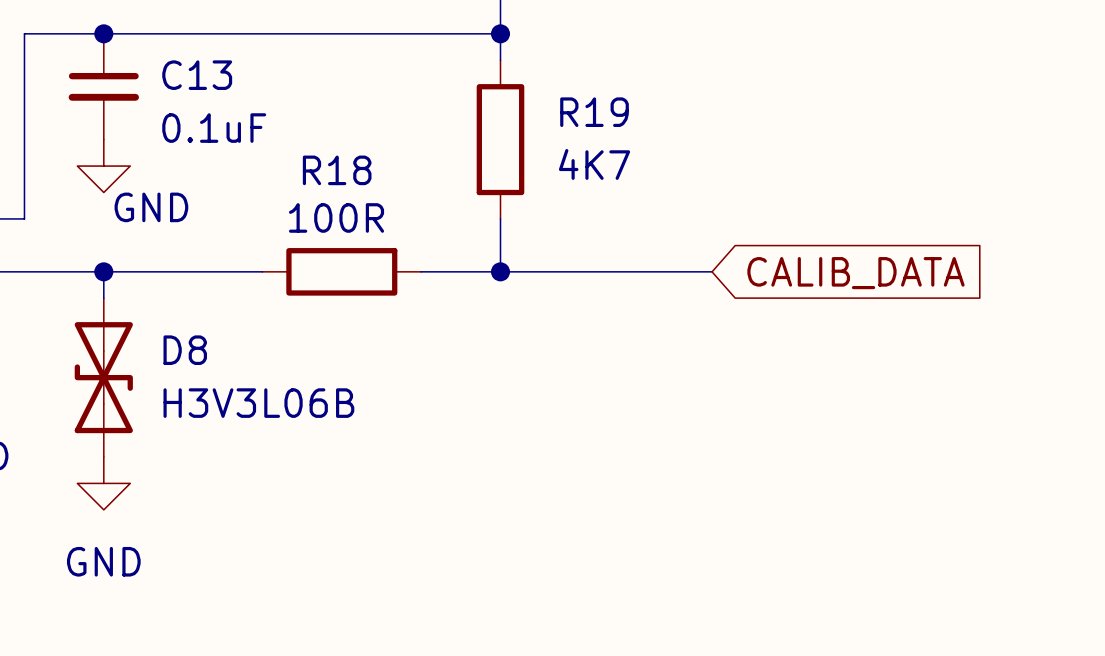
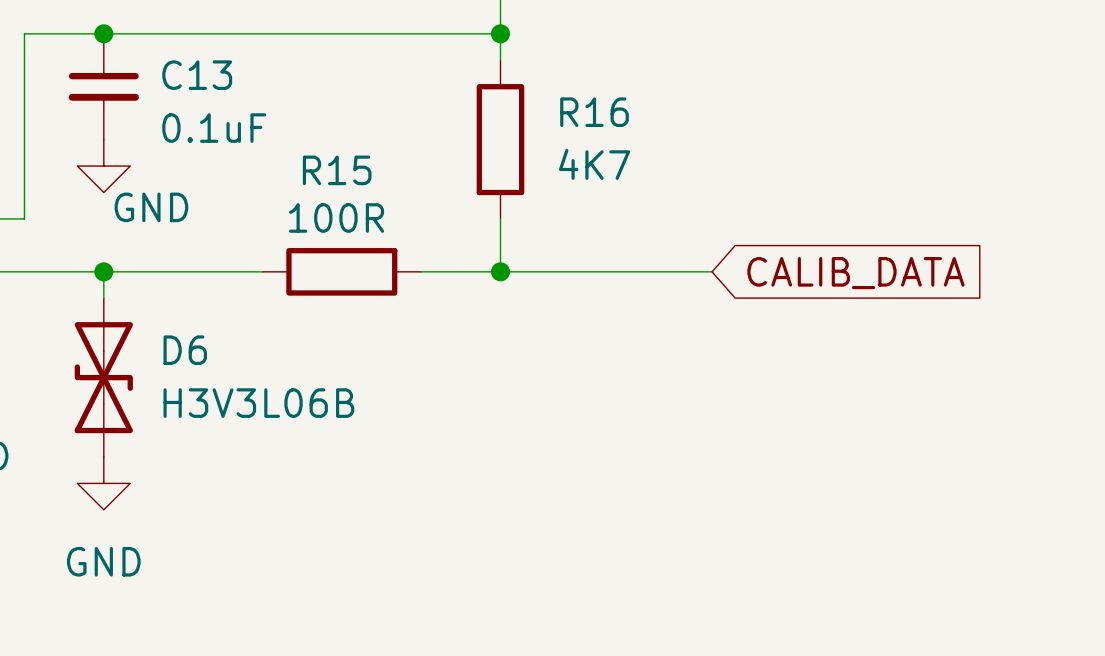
R19 name: R19 (594, 112) -> R16 (594, 112)
R18 name: R18 (337, 170) -> R15 (337, 170)
D8 name: D8 (185, 350) -> D6 (185, 350)

